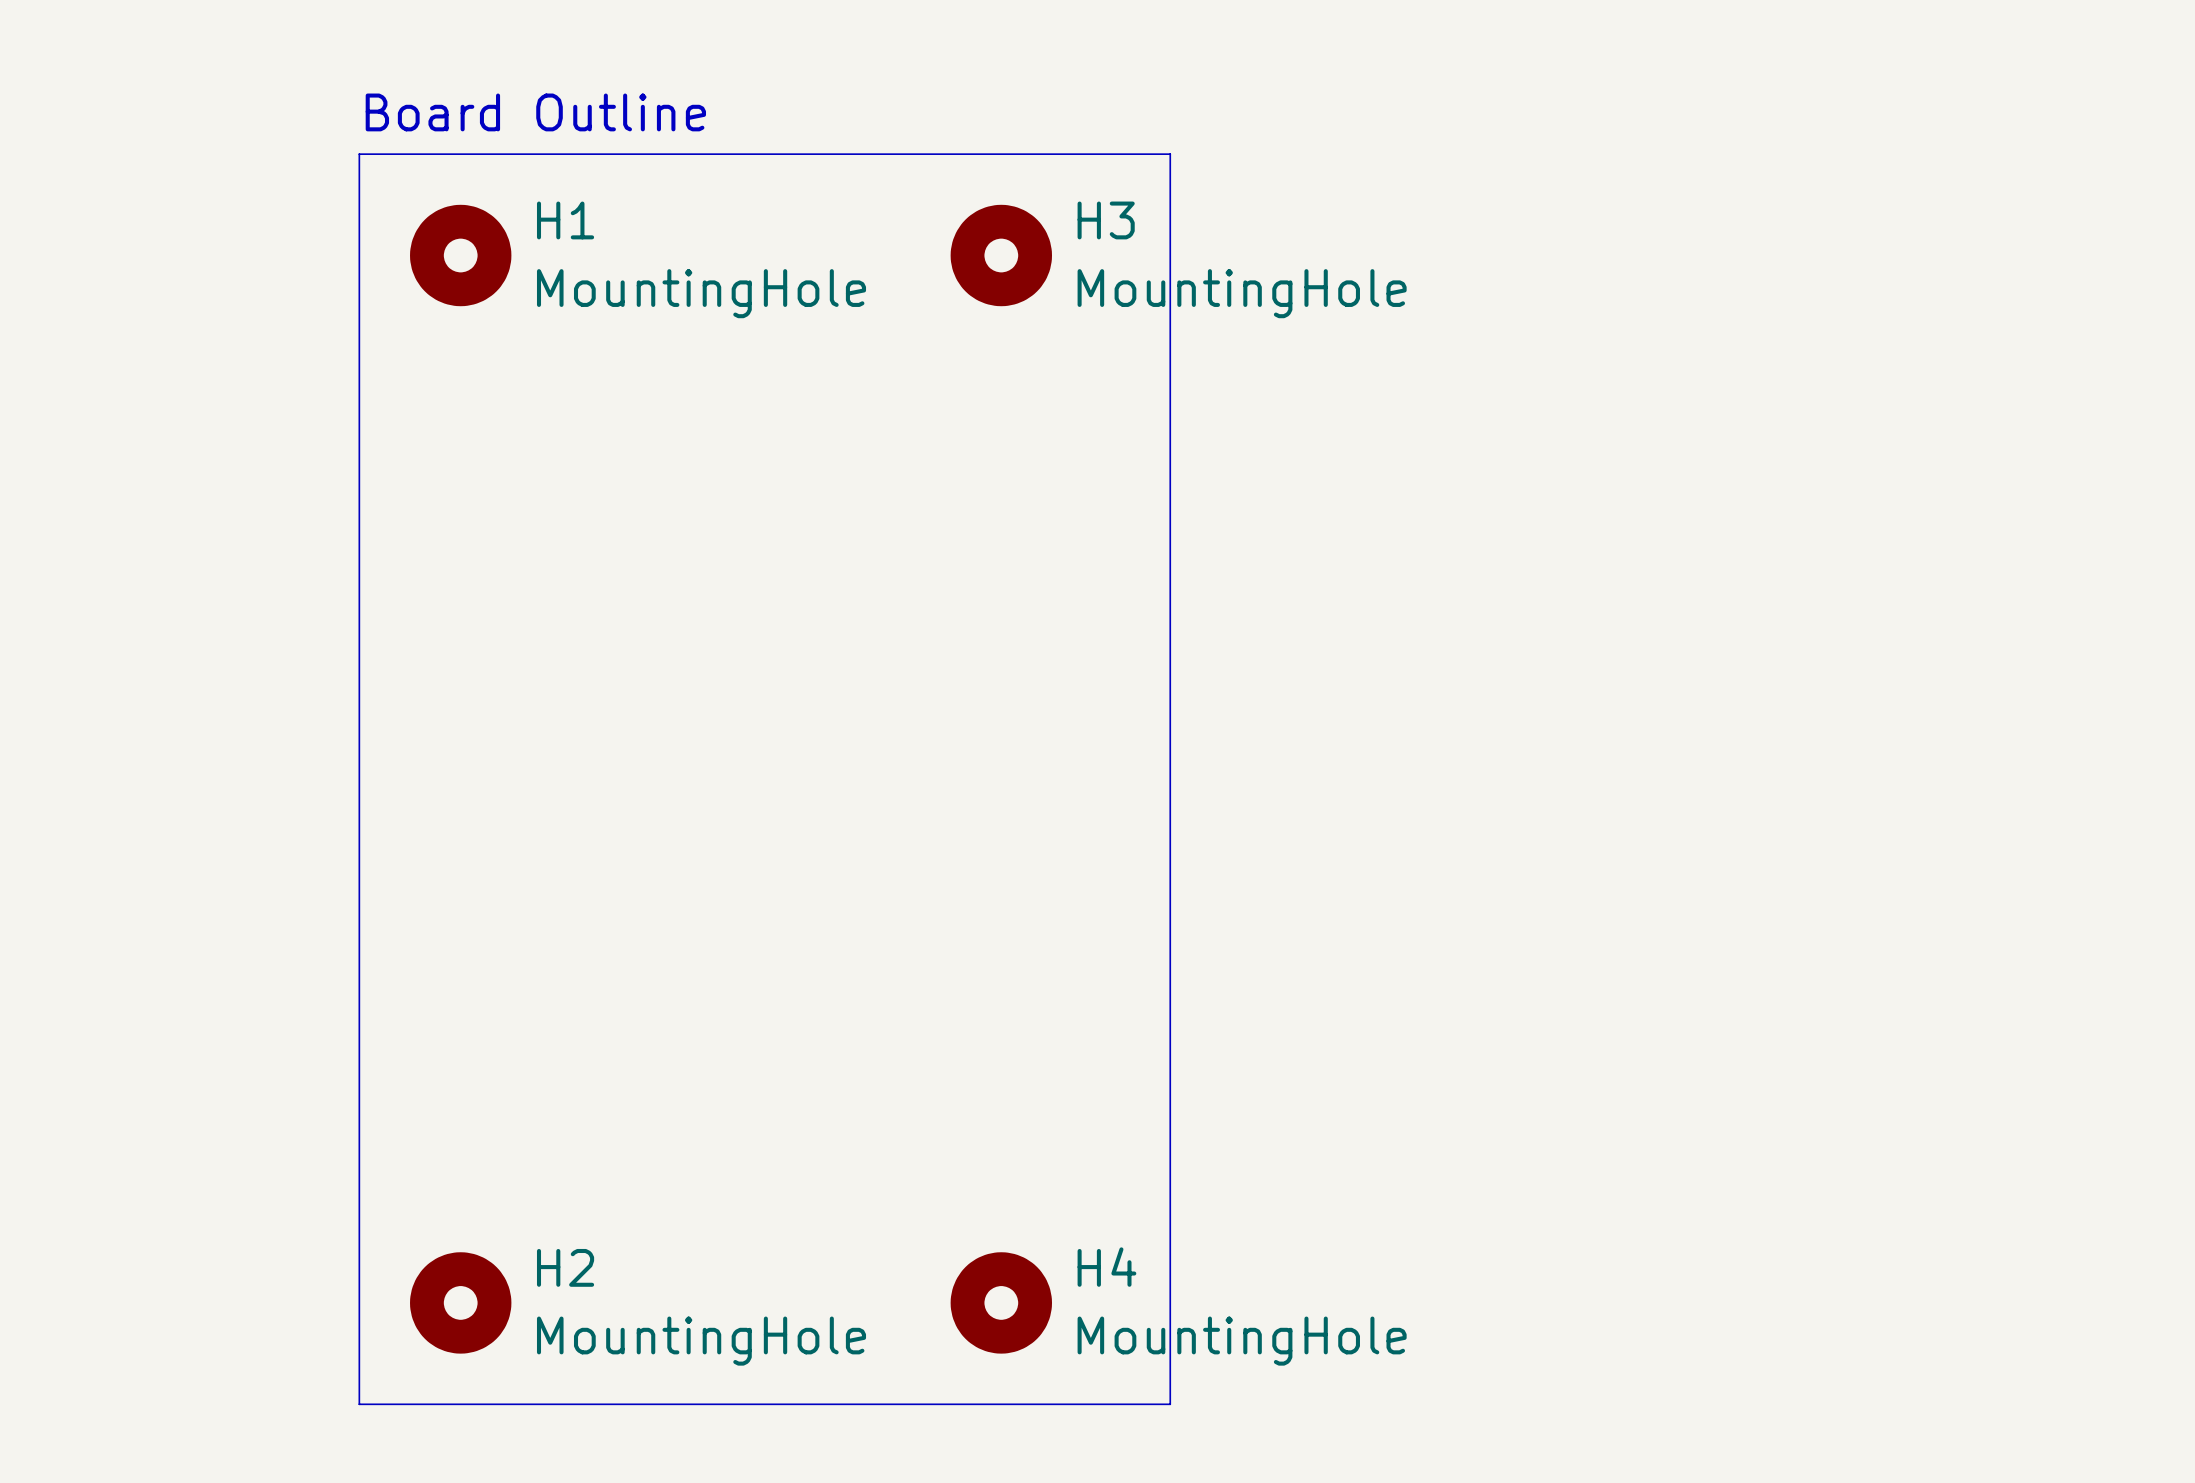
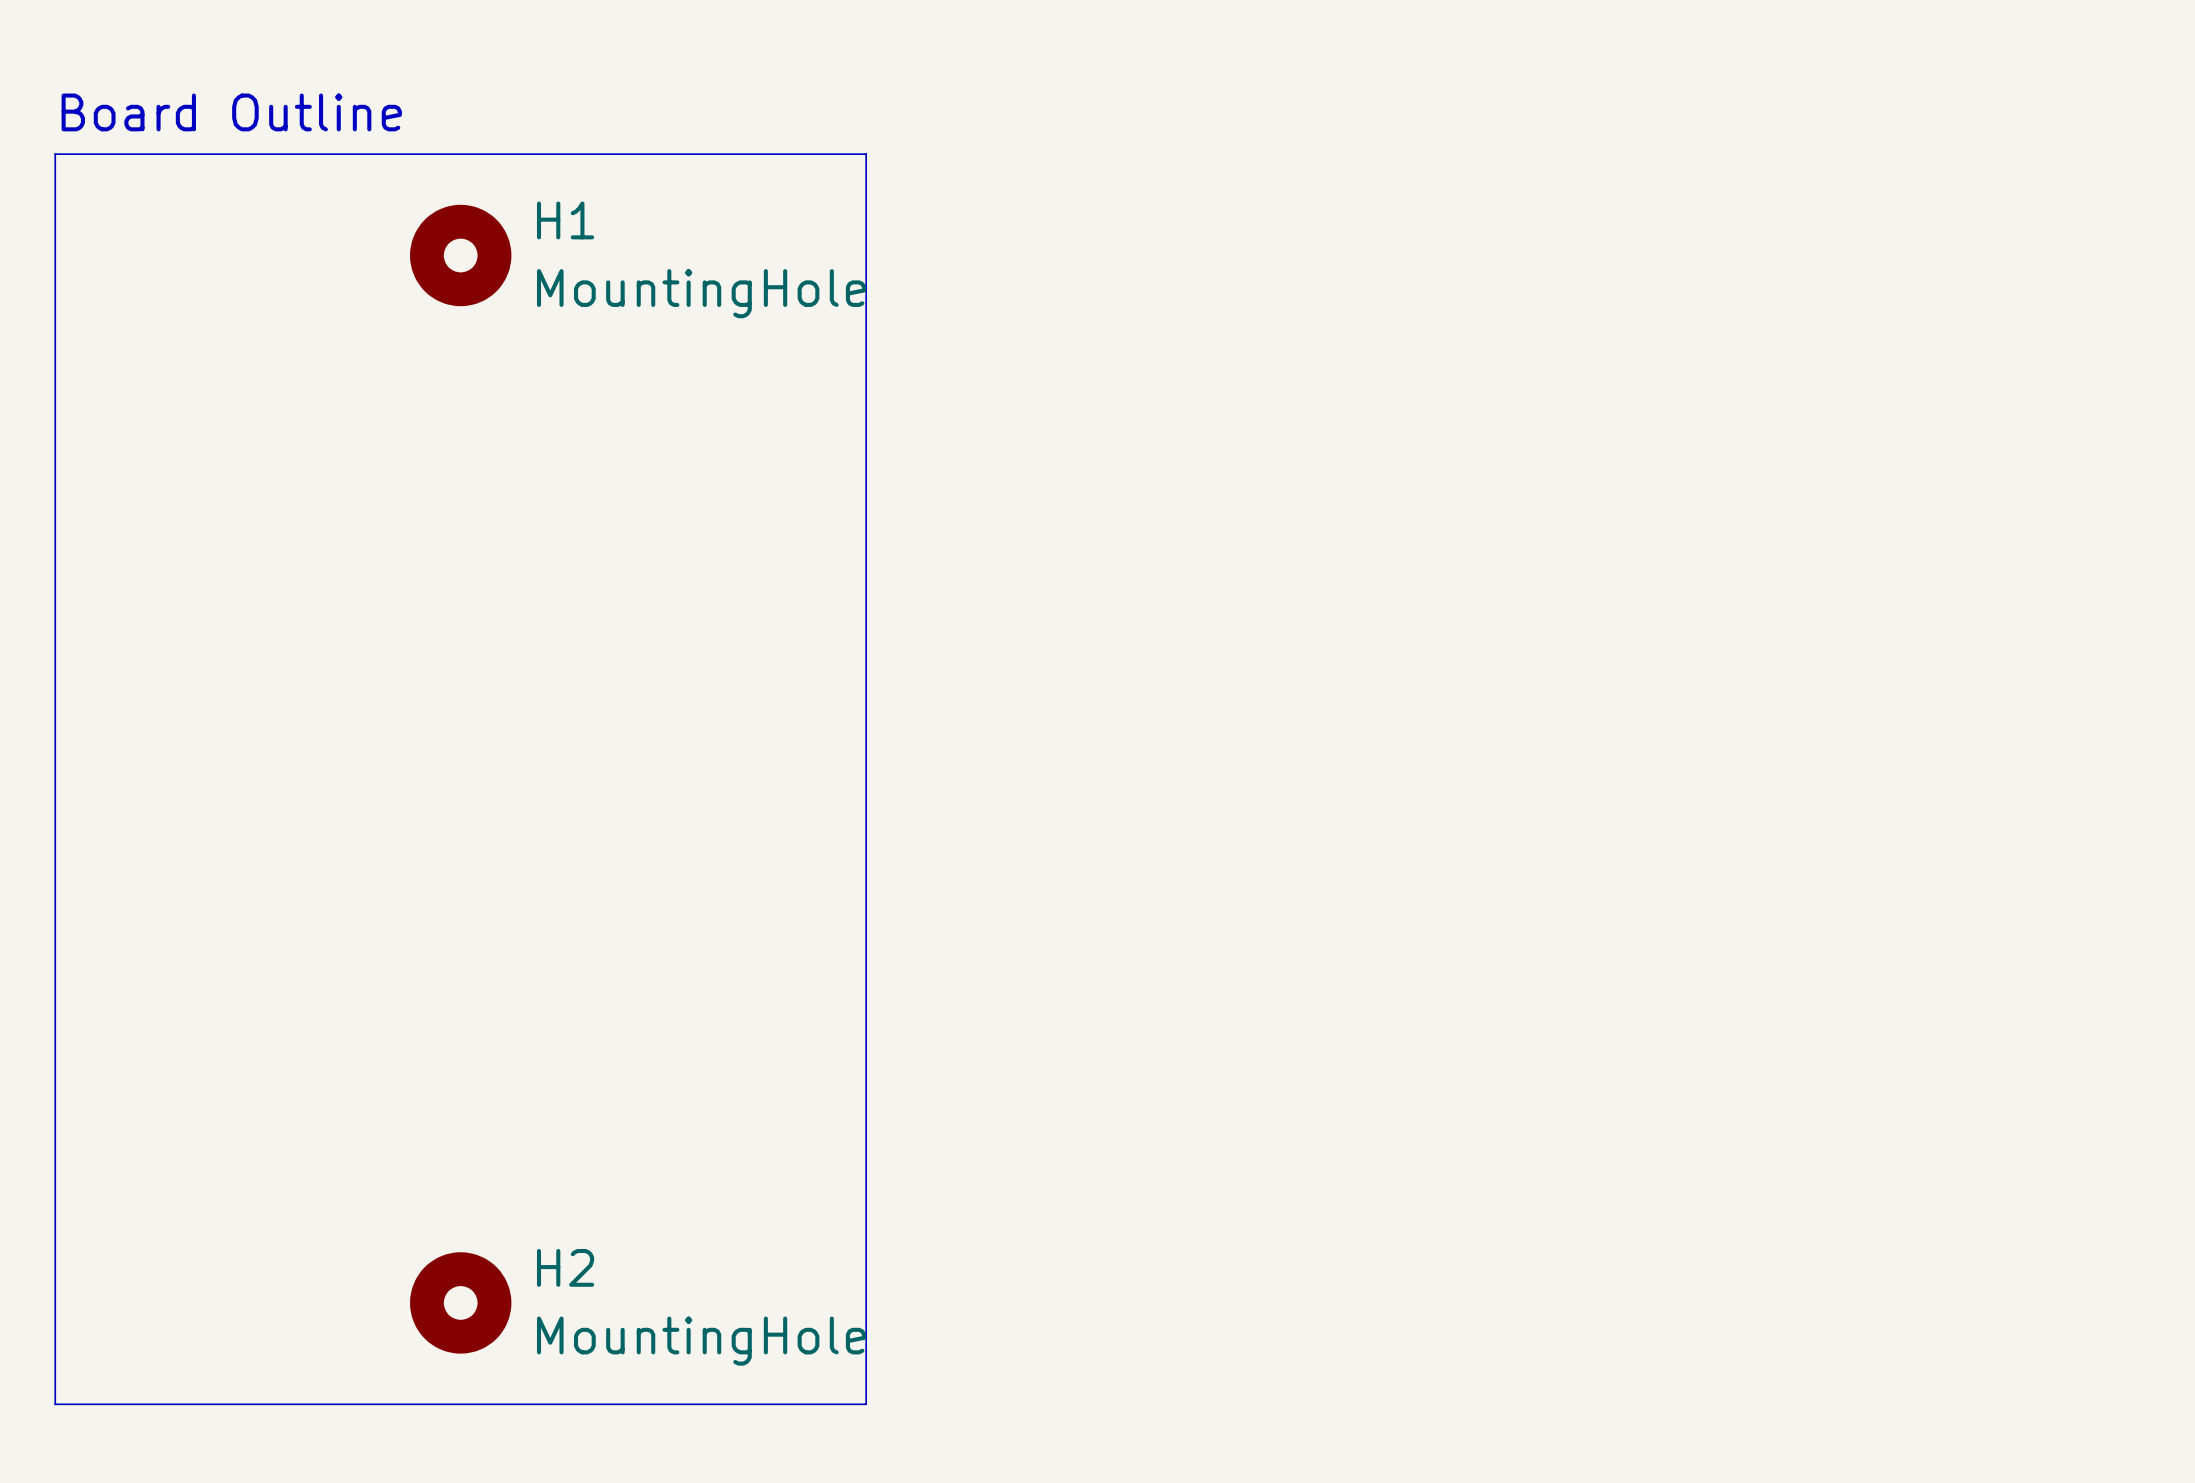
text position: Board Outline (535, 112) -> Board Outline (231, 112)
line: (359, 154) (359, 1404) -> (359, 154) (55, 154) (55, 1404) (359, 1404)
line: (866, 154) (1170, 154) (1170, 1404) (866, 1404) -> (866, 154) (866, 1404)
H3: MountingHole (1001, 255) -> none
H4: MountingHole (1001, 1302) -> none

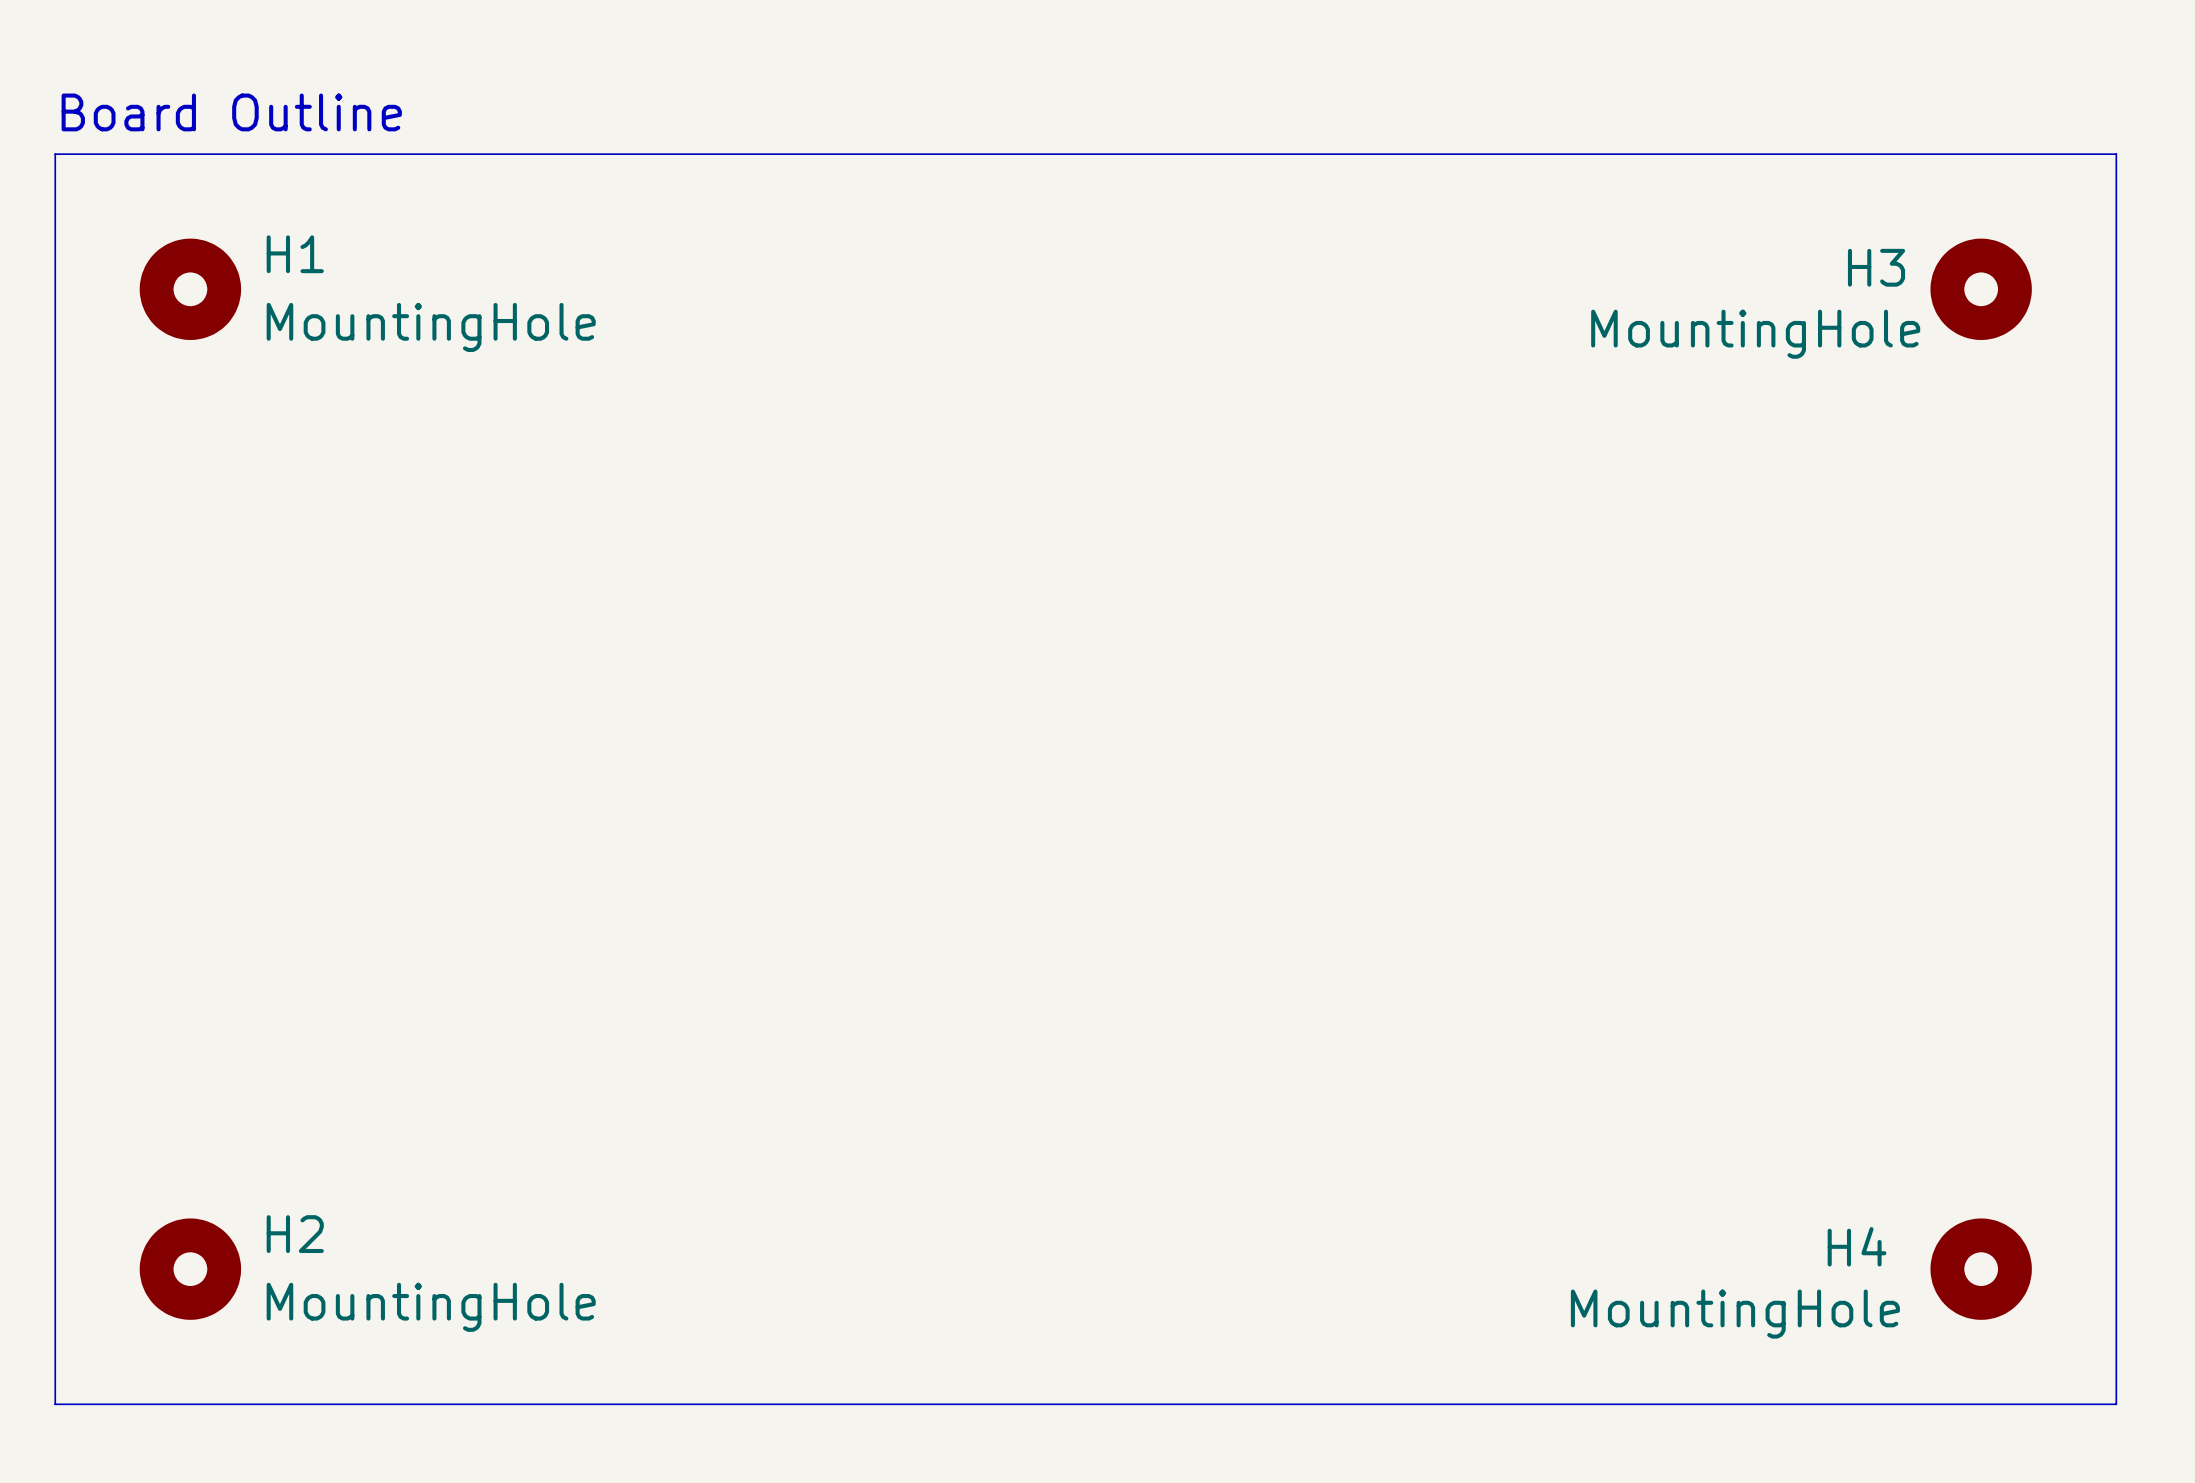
line: (866, 154) (866, 1404) -> (866, 154) (2116, 154) (2116, 1404) (866, 1404)
H1 position: (460, 255) -> (190, 289)
H3: none -> MountingHole (1981, 289)
H4: none -> MountingHole (1981, 1269)
H2 position: (460, 1302) -> (190, 1269)

